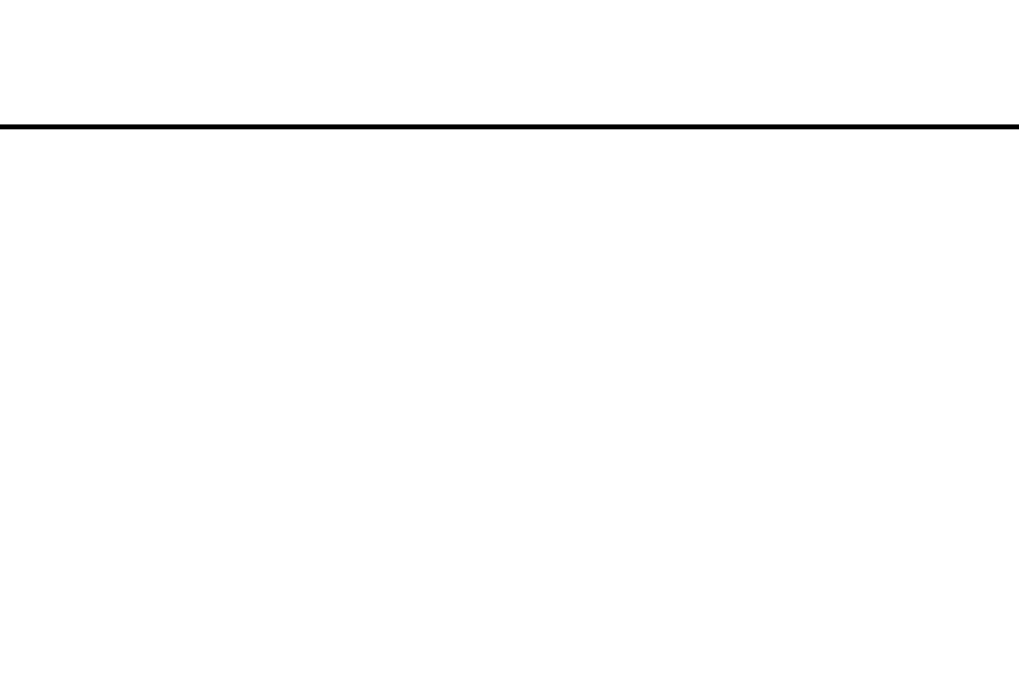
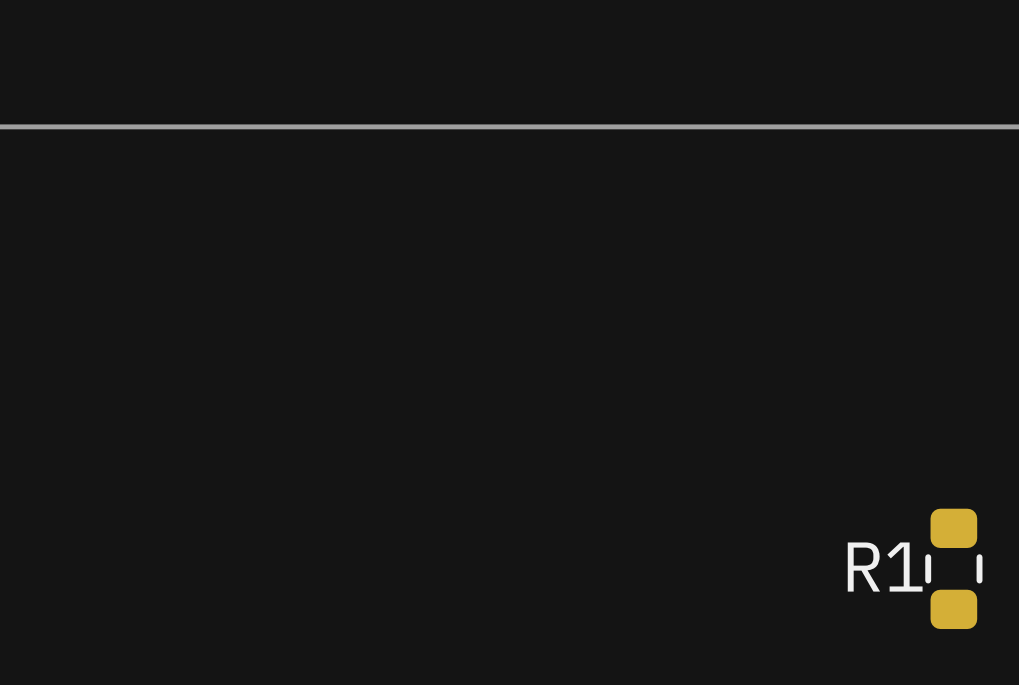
R1: none -> (953, 568)

